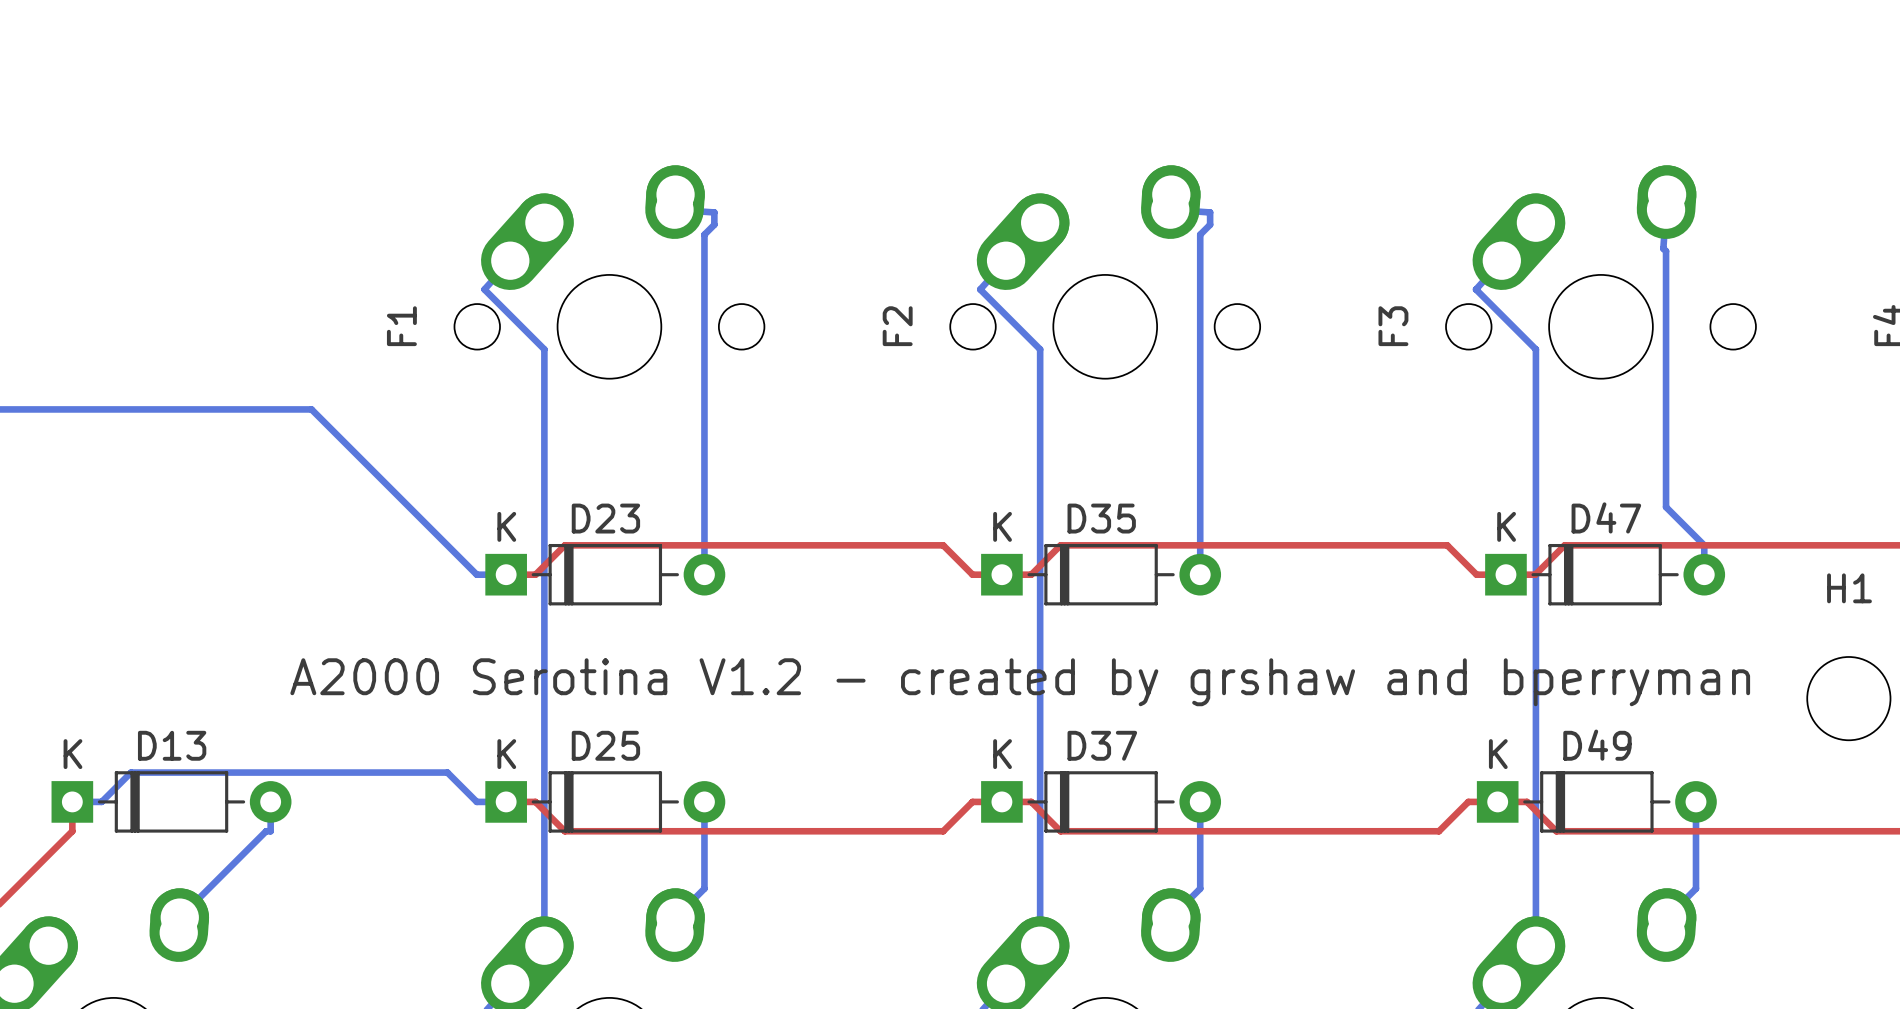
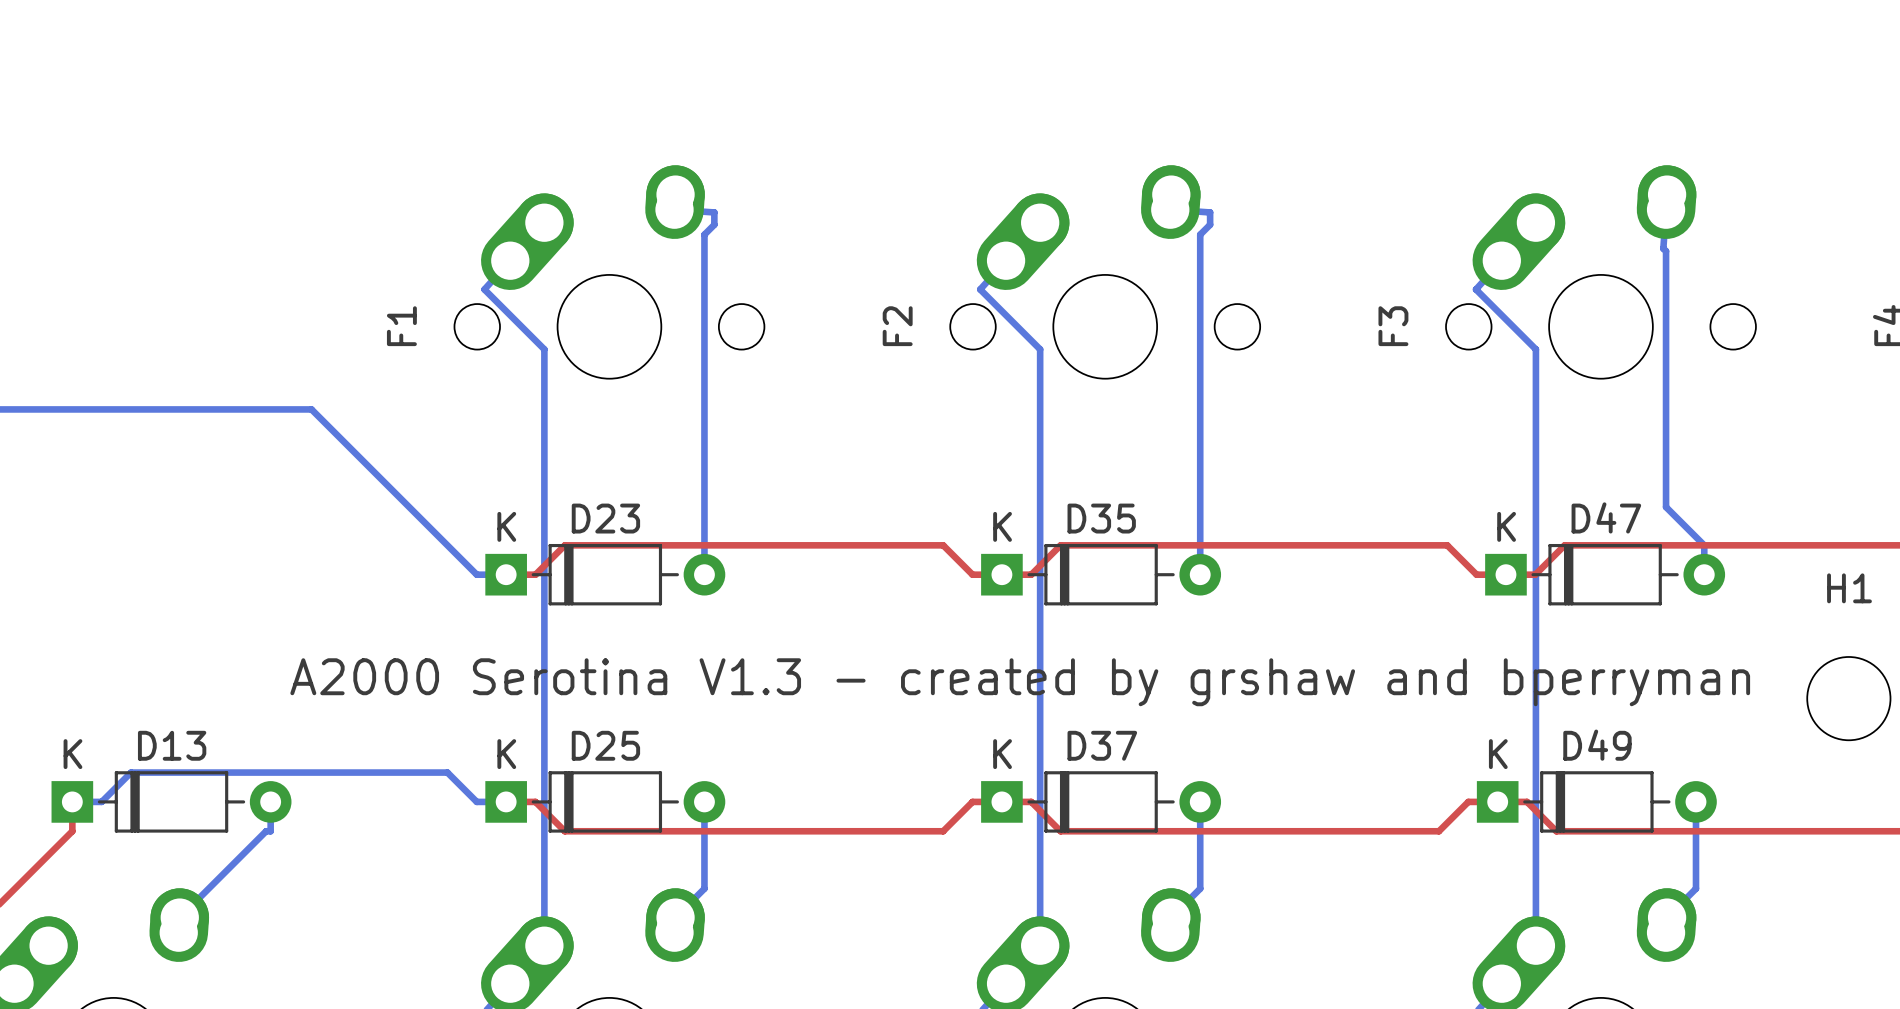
text: A2000 Serotina V1.2 - created by grshaw and bperryman (1020, 682) -> A2000 Serotina V1.3 - created by grshaw and bperryman (1020, 682)

